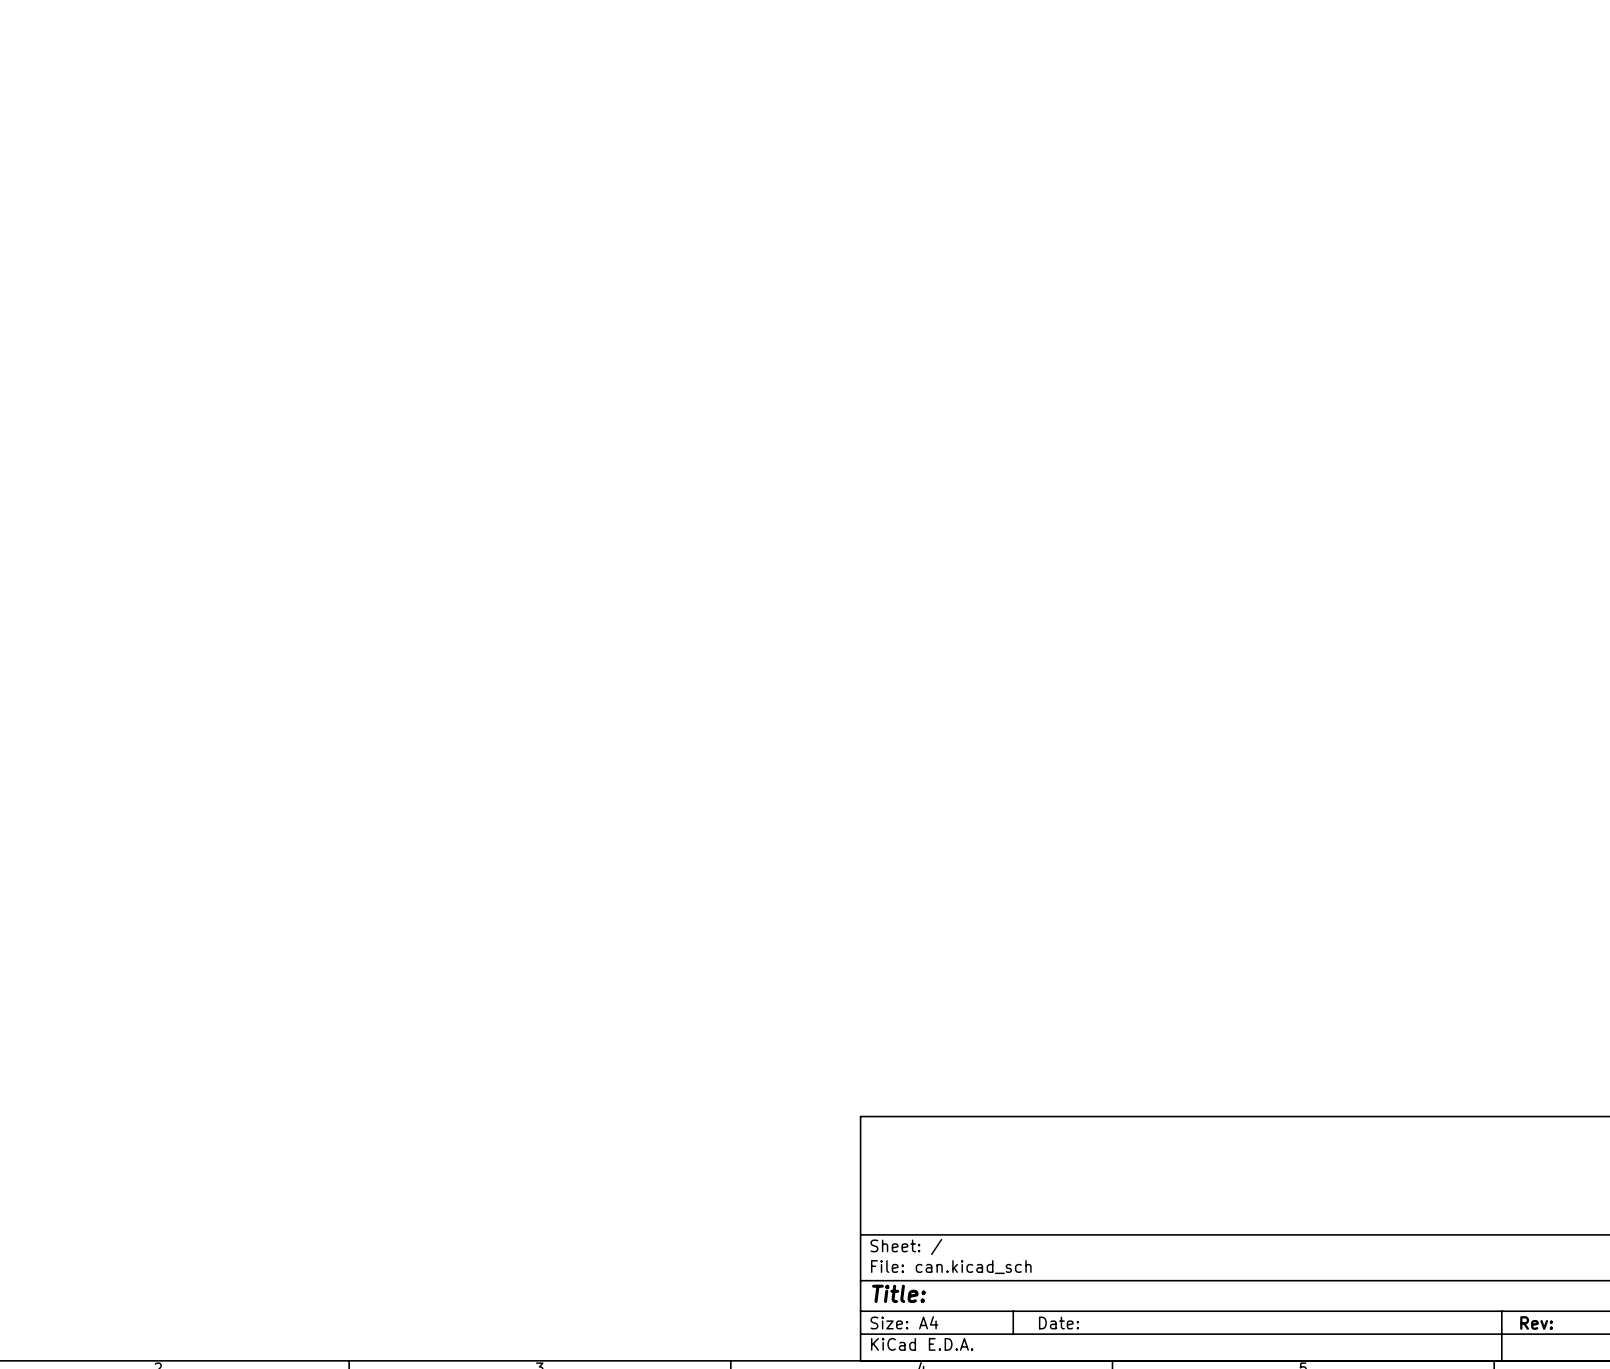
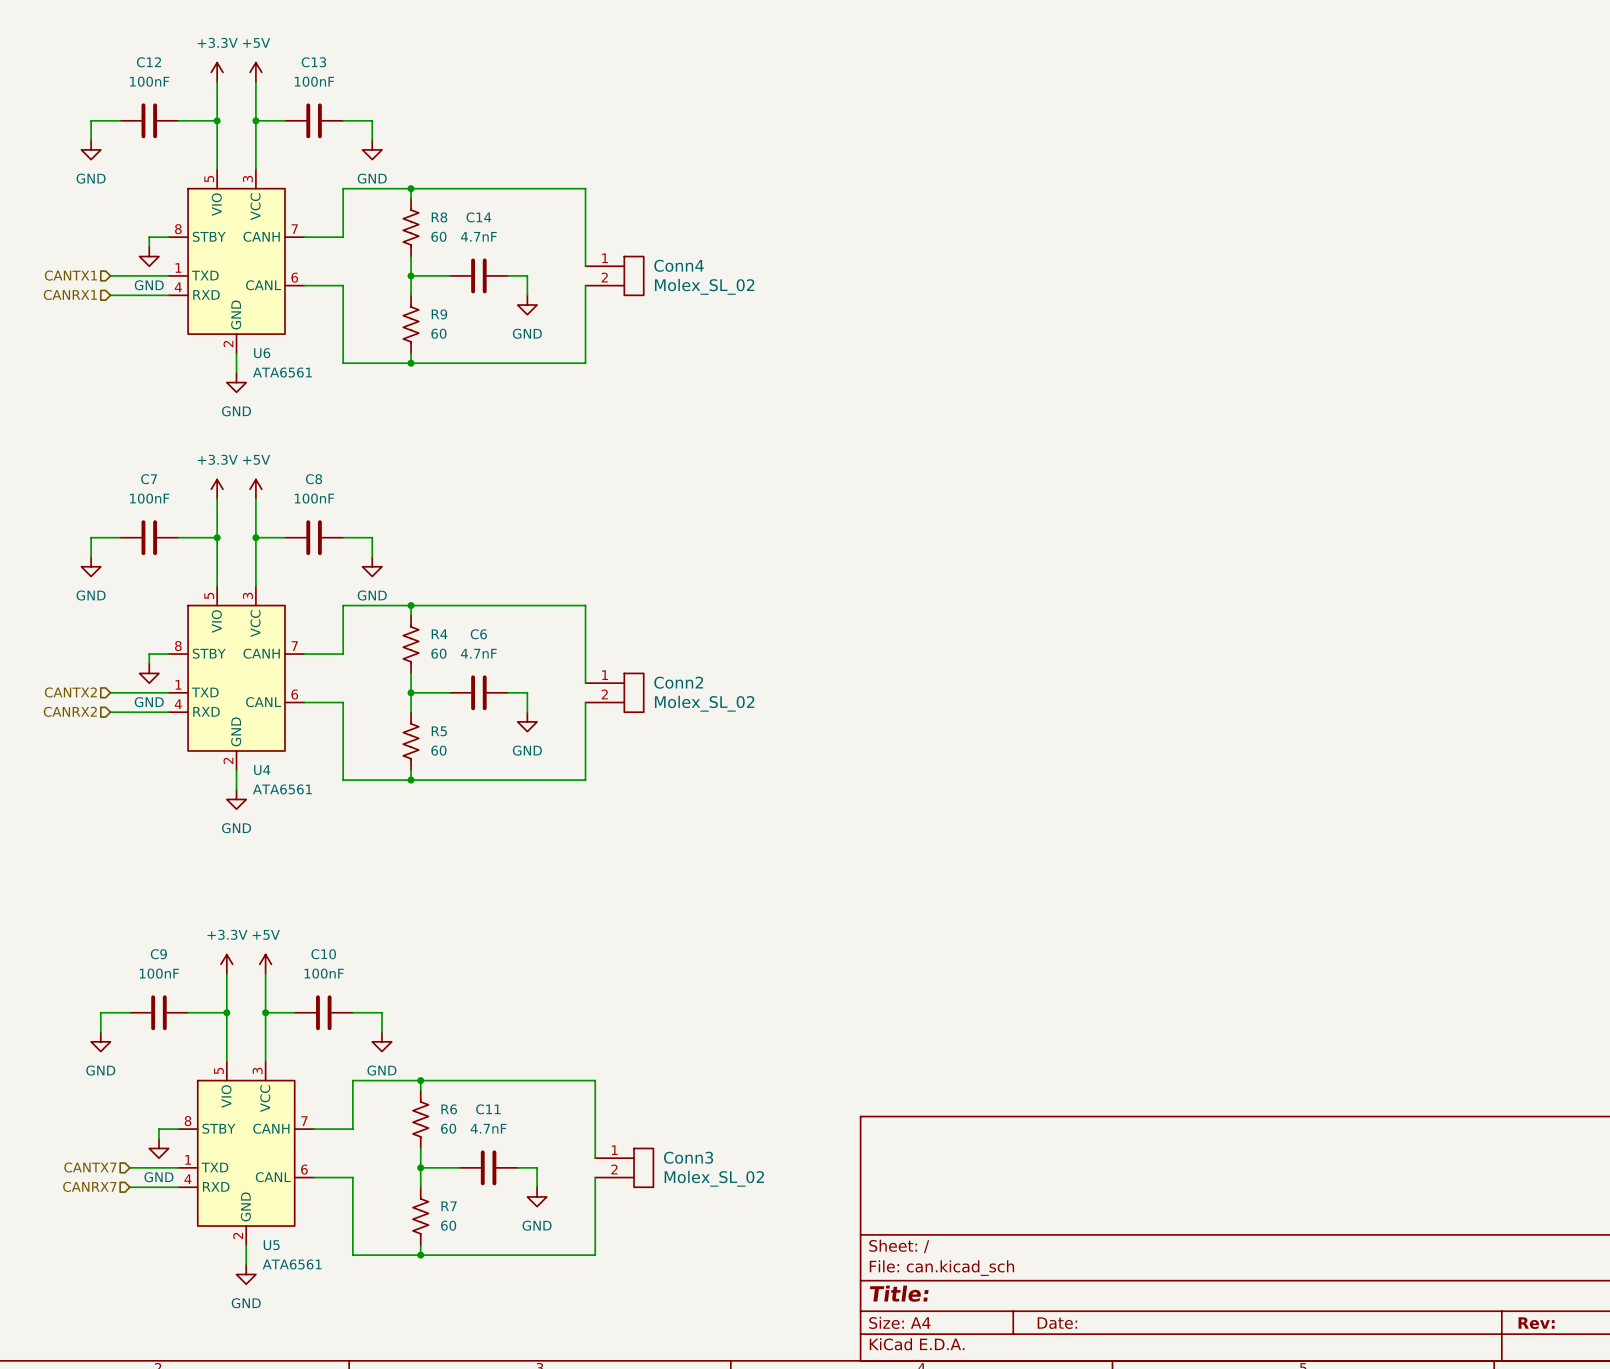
power symbol: none -> +3.3V (217, 72)
power symbol: none -> +5V (255, 72)
wire: none -> (217, 82) (217, 169)
wire: none -> (255, 82) (255, 169)
wire: none -> (120, 120) (91, 120) (91, 140)
C12: none -> 100nF (149, 120)
wire: none -> (178, 120) (217, 120)
junction: none -> (217, 120)
wire: none -> (255, 120) (285, 120)
junction: none -> (255, 120)
C13: none -> 100nF (314, 120)
wire: none -> (343, 120) (372, 120) (372, 140)
power symbol: none -> GND (91, 149)
power symbol: none -> GND (372, 149)
wire: none -> (411, 188) (411, 198)
junction: none -> (411, 188)
R8: none -> 60 (411, 227)
wire: none -> (168, 237) (149, 237) (149, 246)
wire: none -> (304, 237) (343, 237) (343, 188) (585, 188) (585, 266)
power symbol: none -> GND (149, 256)
wire: none -> (411, 256) (411, 295)
U6: none -> ATA6561 (236, 261)
hierarchical label: none -> CANTX1 (70, 275)
wire: none -> (110, 275) (168, 275)
wire: none -> (411, 275) (449, 275)
junction: none -> (411, 275)
C14: none -> 4.7nF (478, 275)
wire: none -> (507, 275) (527, 275) (527, 295)
Conn4: none -> Molex_SL_02 (614, 275)
wire: none -> (304, 285) (343, 285) (343, 363) (585, 363) (585, 285)
hierarchical label: none -> CANRX1 (70, 294)
wire: none -> (110, 295) (168, 295)
power symbol: none -> GND (527, 305)
R9: none -> 60 (411, 324)
wire: none -> (236, 353) (236, 372)
wire: none -> (411, 353) (411, 363)
junction: none -> (411, 363)
power symbol: none -> GND (236, 382)
power symbol: none -> +3.3V (217, 489)
power symbol: none -> +5V (255, 489)
wire: none -> (217, 498) (217, 586)
wire: none -> (255, 498) (255, 586)
wire: none -> (120, 537) (91, 537) (91, 557)
C7: none -> 100nF (149, 537)
wire: none -> (178, 537) (217, 537)
junction: none -> (217, 537)
wire: none -> (255, 537) (285, 537)
junction: none -> (255, 537)
C8: none -> 100nF (314, 537)
wire: none -> (343, 537) (372, 537) (372, 557)
power symbol: none -> GND (91, 566)
power symbol: none -> GND (372, 566)
wire: none -> (411, 605) (411, 615)
junction: none -> (411, 605)
R4: none -> 60 (411, 644)
wire: none -> (168, 654) (149, 654) (149, 663)
wire: none -> (304, 654) (343, 654) (343, 605) (585, 605) (585, 683)
power symbol: none -> GND (149, 673)
wire: none -> (411, 673) (411, 712)
U4: none -> ATA6561 (236, 678)
hierarchical label: none -> CANTX2 (70, 692)
wire: none -> (110, 692) (168, 692)
wire: none -> (411, 692) (449, 692)
junction: none -> (411, 692)
C6: none -> 4.7nF (478, 692)
wire: none -> (507, 692) (527, 692) (527, 712)
Conn2: none -> Molex_SL_02 (614, 692)
wire: none -> (304, 702) (343, 702) (343, 780) (585, 780) (585, 702)
hierarchical label: none -> CANRX2 (70, 711)
wire: none -> (110, 712) (168, 712)
power symbol: none -> GND (527, 721)
R5: none -> 60 (411, 741)
wire: none -> (236, 770) (236, 789)
wire: none -> (411, 770) (411, 780)
junction: none -> (411, 780)
power symbol: none -> GND (236, 799)
power symbol: none -> +3.3V (226, 964)
power symbol: none -> +5V (265, 964)
wire: none -> (226, 973) (226, 1061)
wire: none -> (265, 973) (265, 1061)
wire: none -> (129, 1012) (100, 1012) (100, 1032)
C9: none -> 100nF (158, 1012)
wire: none -> (188, 1012) (226, 1012)
junction: none -> (226, 1012)
wire: none -> (265, 1012) (294, 1012)
junction: none -> (265, 1012)
C10: none -> 100nF (323, 1012)
wire: none -> (352, 1012) (381, 1012) (381, 1032)
power symbol: none -> GND (100, 1041)
power symbol: none -> GND (381, 1041)
wire: none -> (420, 1080) (420, 1090)
junction: none -> (420, 1080)
R6: none -> 60 (420, 1119)
wire: none -> (178, 1129) (158, 1129) (158, 1138)
wire: none -> (314, 1129) (352, 1129) (352, 1080) (595, 1080) (595, 1158)
power symbol: none -> GND (158, 1148)
wire: none -> (420, 1148) (420, 1187)
U5: none -> ATA6561 (246, 1153)
hierarchical label: none -> CANTX7 (90, 1167)
wire: none -> (129, 1167) (178, 1167)
wire: none -> (420, 1167) (459, 1167)
junction: none -> (420, 1167)
C11: none -> 4.7nF (488, 1167)
wire: none -> (517, 1167) (537, 1167) (537, 1187)
Conn3: none -> Molex_SL_02 (624, 1167)
wire: none -> (314, 1177) (352, 1177) (352, 1255) (595, 1255) (595, 1177)
hierarchical label: none -> CANRX7 (89, 1186)
wire: none -> (129, 1187) (178, 1187)
power symbol: none -> GND (537, 1196)
R7: none -> 60 (420, 1216)
wire: none -> (246, 1245) (246, 1264)
wire: none -> (420, 1245) (420, 1255)
junction: none -> (420, 1255)
power symbol: none -> GND (246, 1274)

